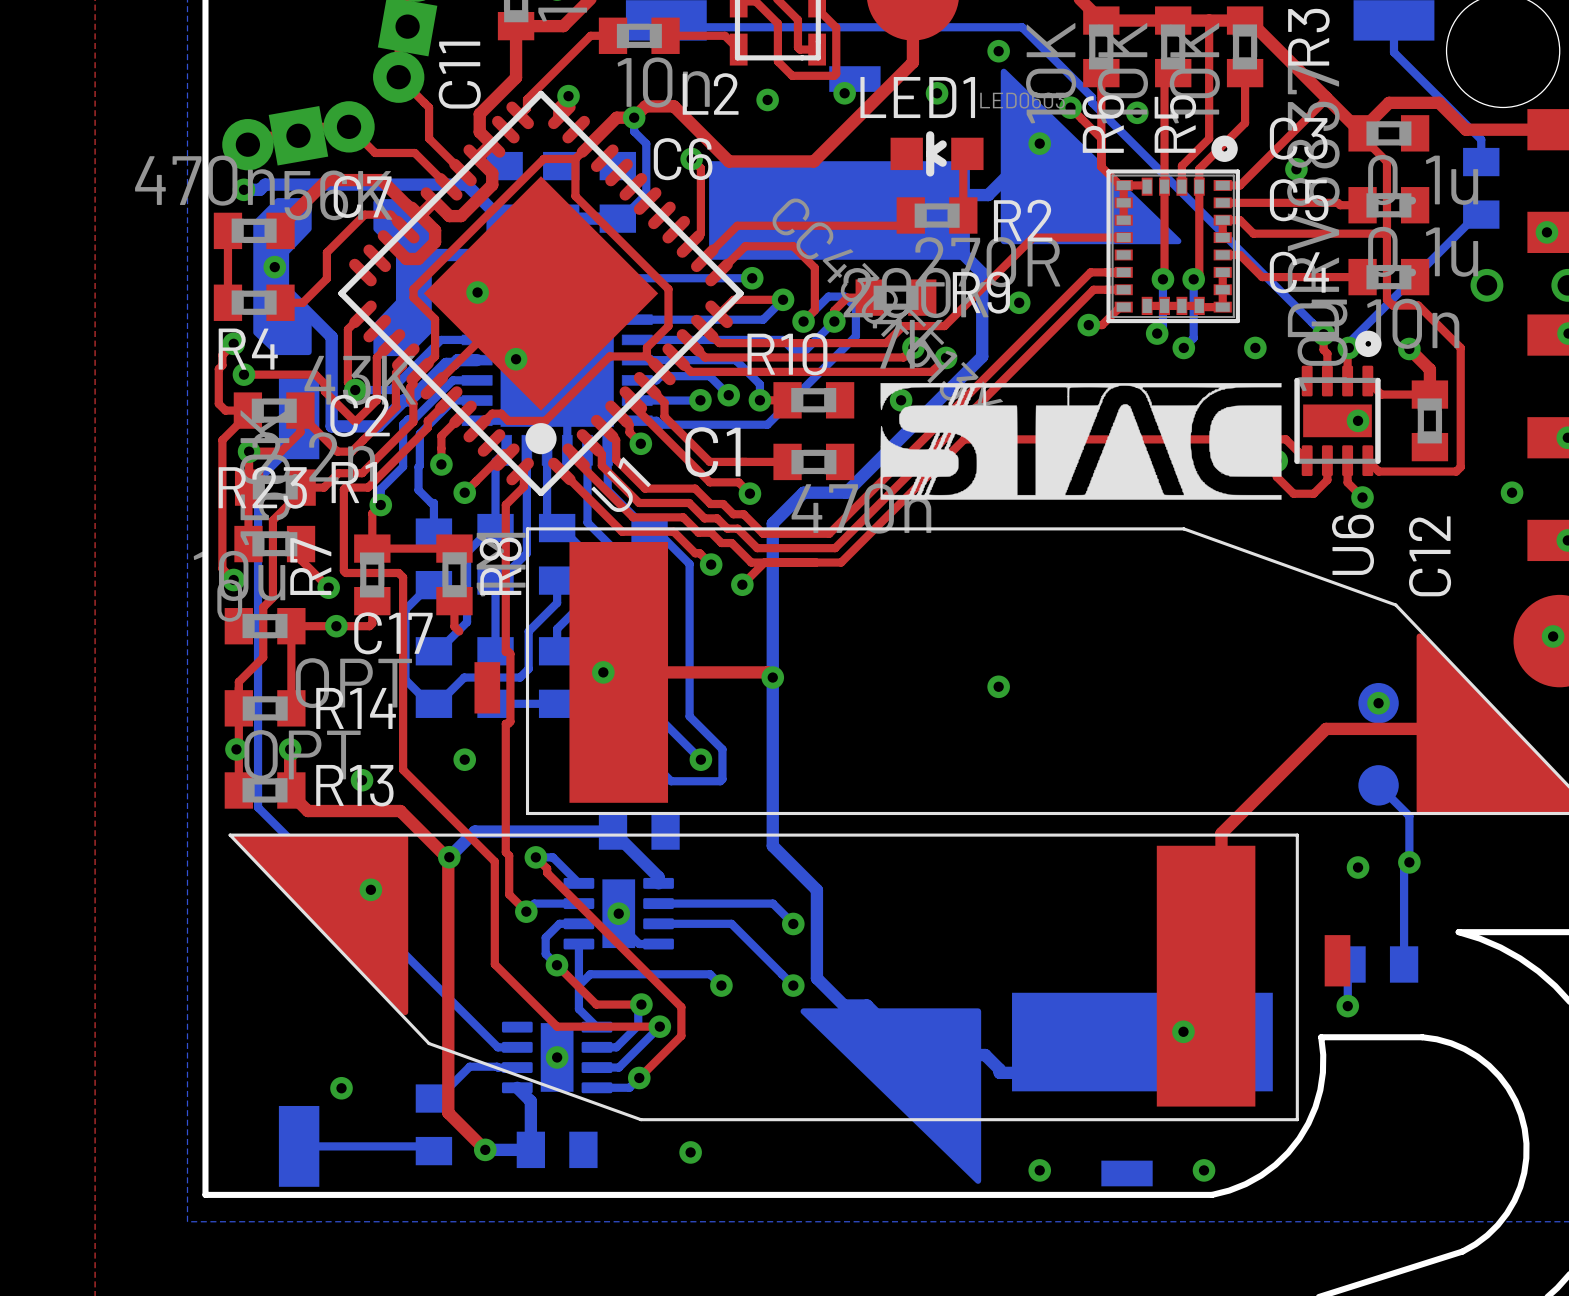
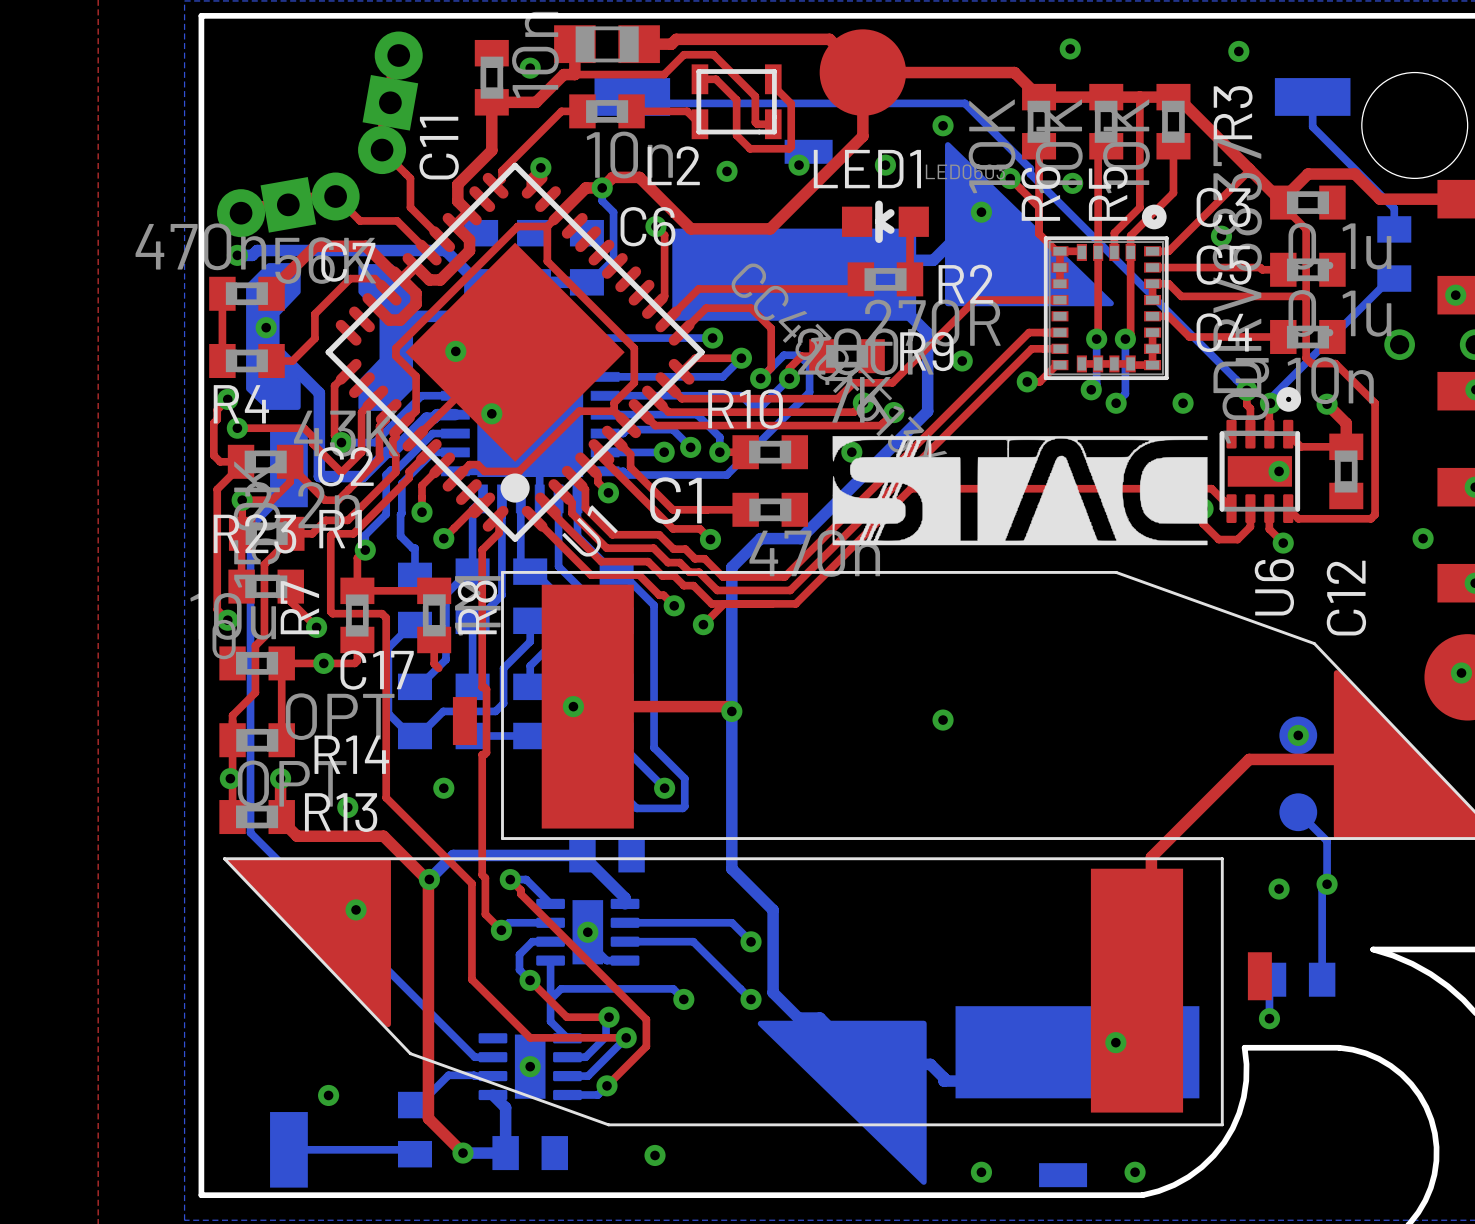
R14 name position: R14 (356, 708) -> R14 (351, 754)

